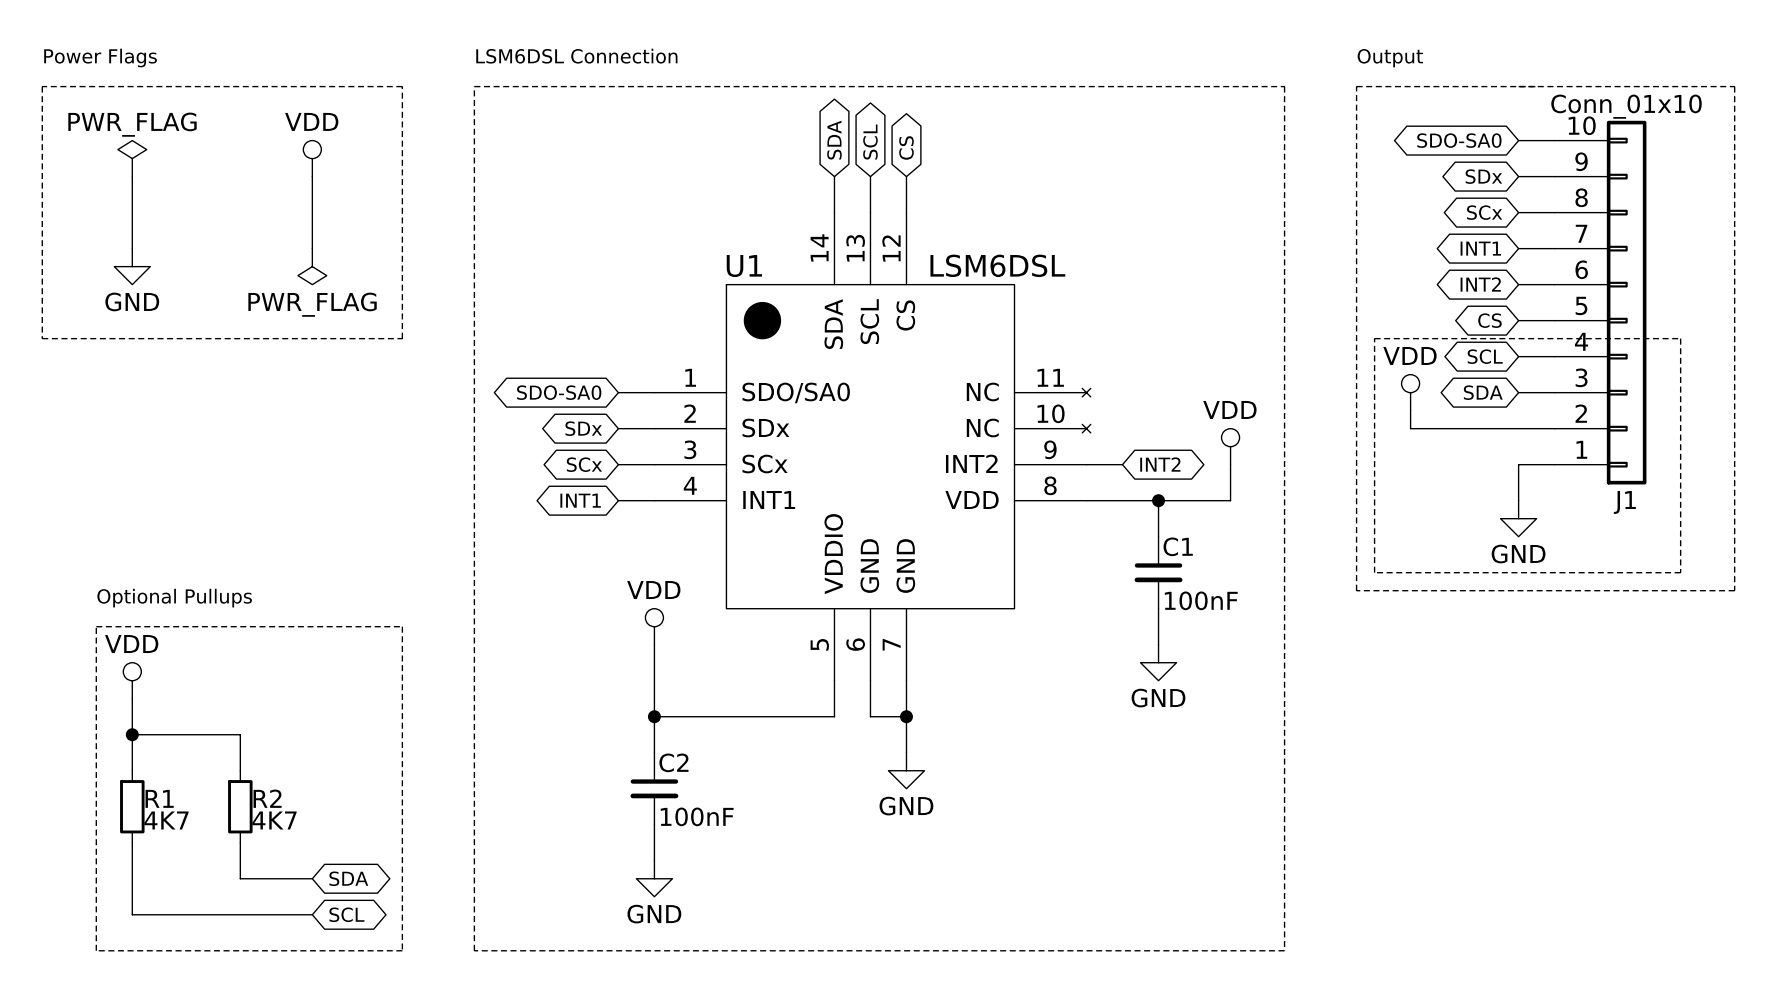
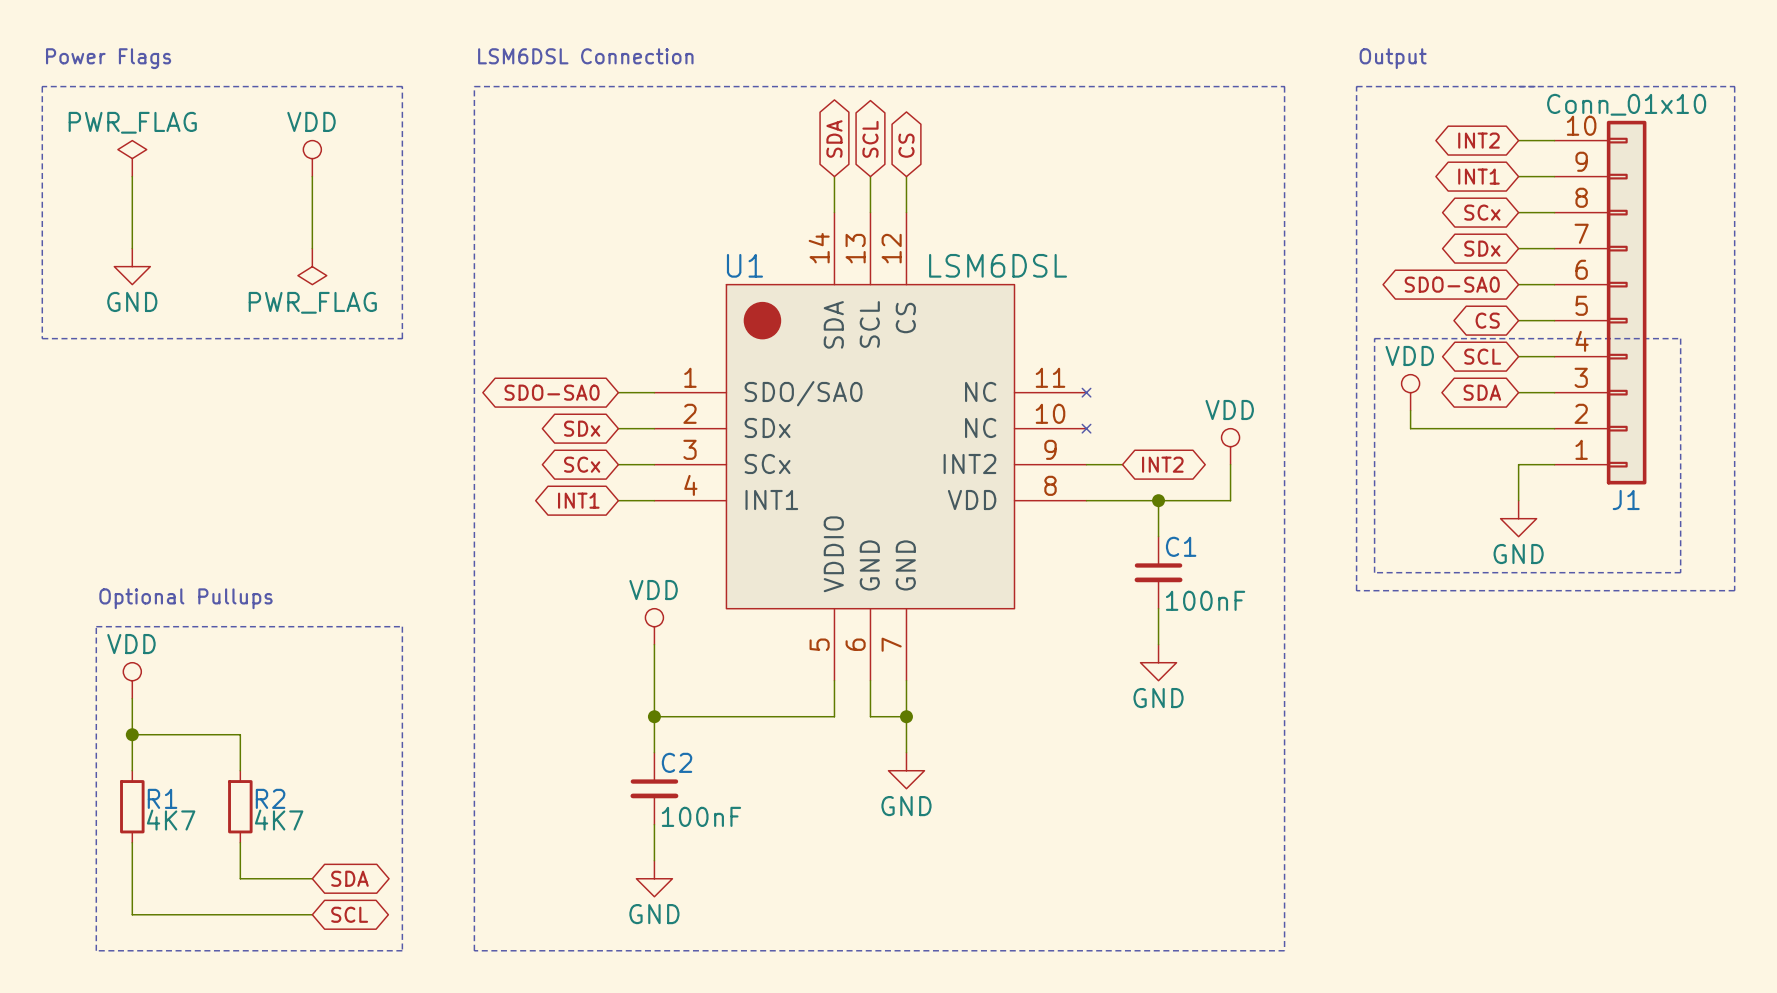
global label: SDO-SA0 (1459, 140) -> INT2 (1478, 140)
global label: SDx (1483, 176) -> INT1 (1478, 176)
global label: INT1 (1480, 248) -> SDx (1482, 248)
global label: INT2 (1480, 284) -> SDO-SA0 (1452, 284)

